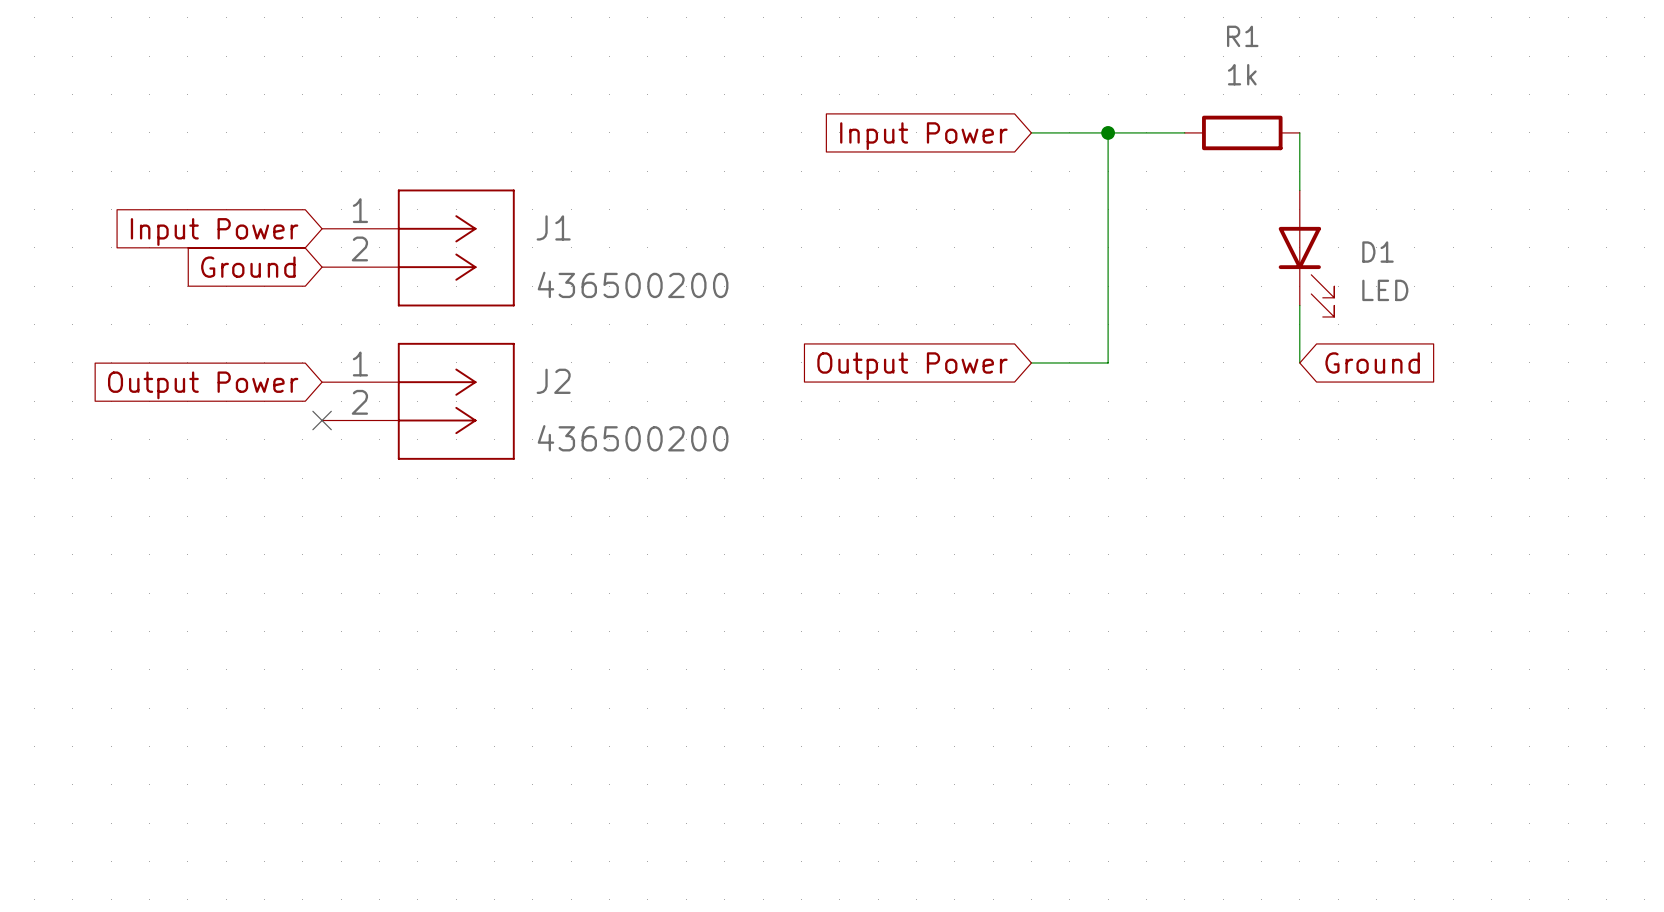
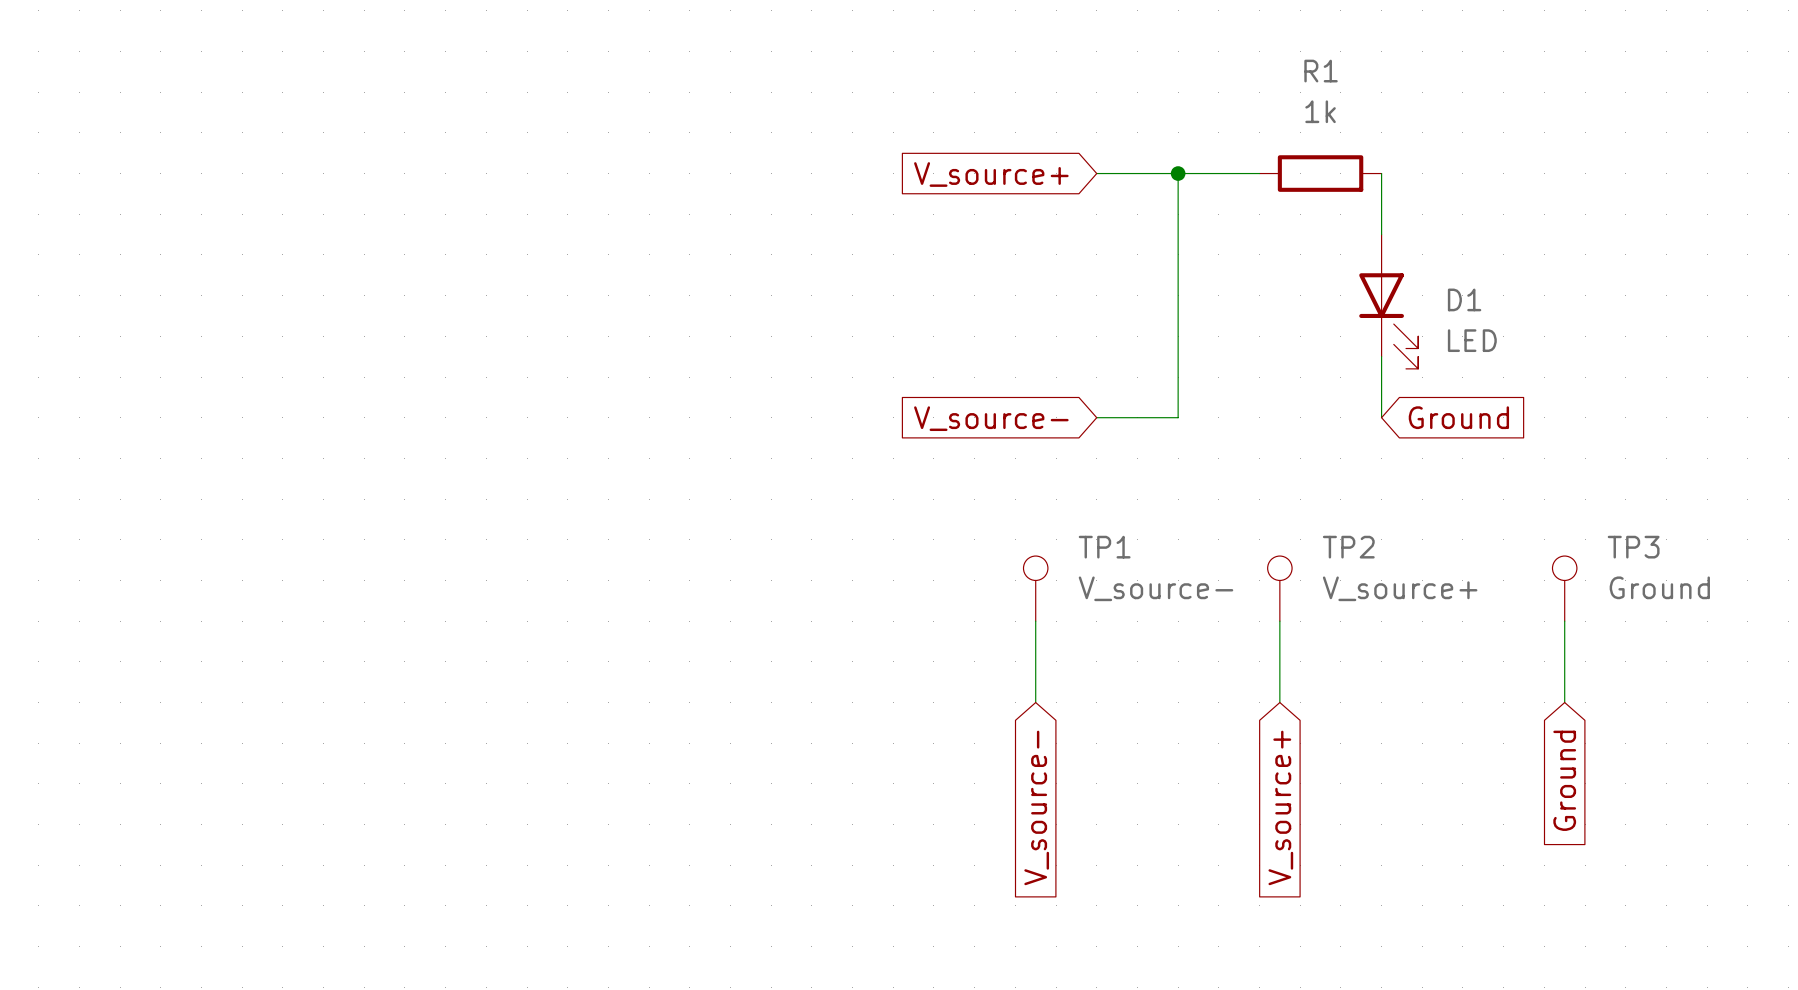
global label: Input Power (923, 136) -> V_source+ (991, 174)
global label: Input Power (214, 231) -> none
J1: 436500200 (418, 247) -> none
global label: Ground (248, 267) -> none
global label: Output Power (912, 366) -> V_source- (991, 418)
global label: Output Power (203, 385) -> none
J2: 436500200 (418, 401) -> none
no-connect mark: (322, 420) -> none
TP1: none -> V_source- (1035, 588)
TP2: none -> V_source+ (1279, 588)
TP3: none -> Ground (1564, 588)
wire: none -> (1035, 621) (1035, 702)
wire: none -> (1279, 621) (1279, 702)
wire: none -> (1564, 621) (1564, 702)
global label: none -> Ground (1564, 780)
global label: none -> V_source- (1036, 807)
global label: none -> V_source+ (1280, 807)

